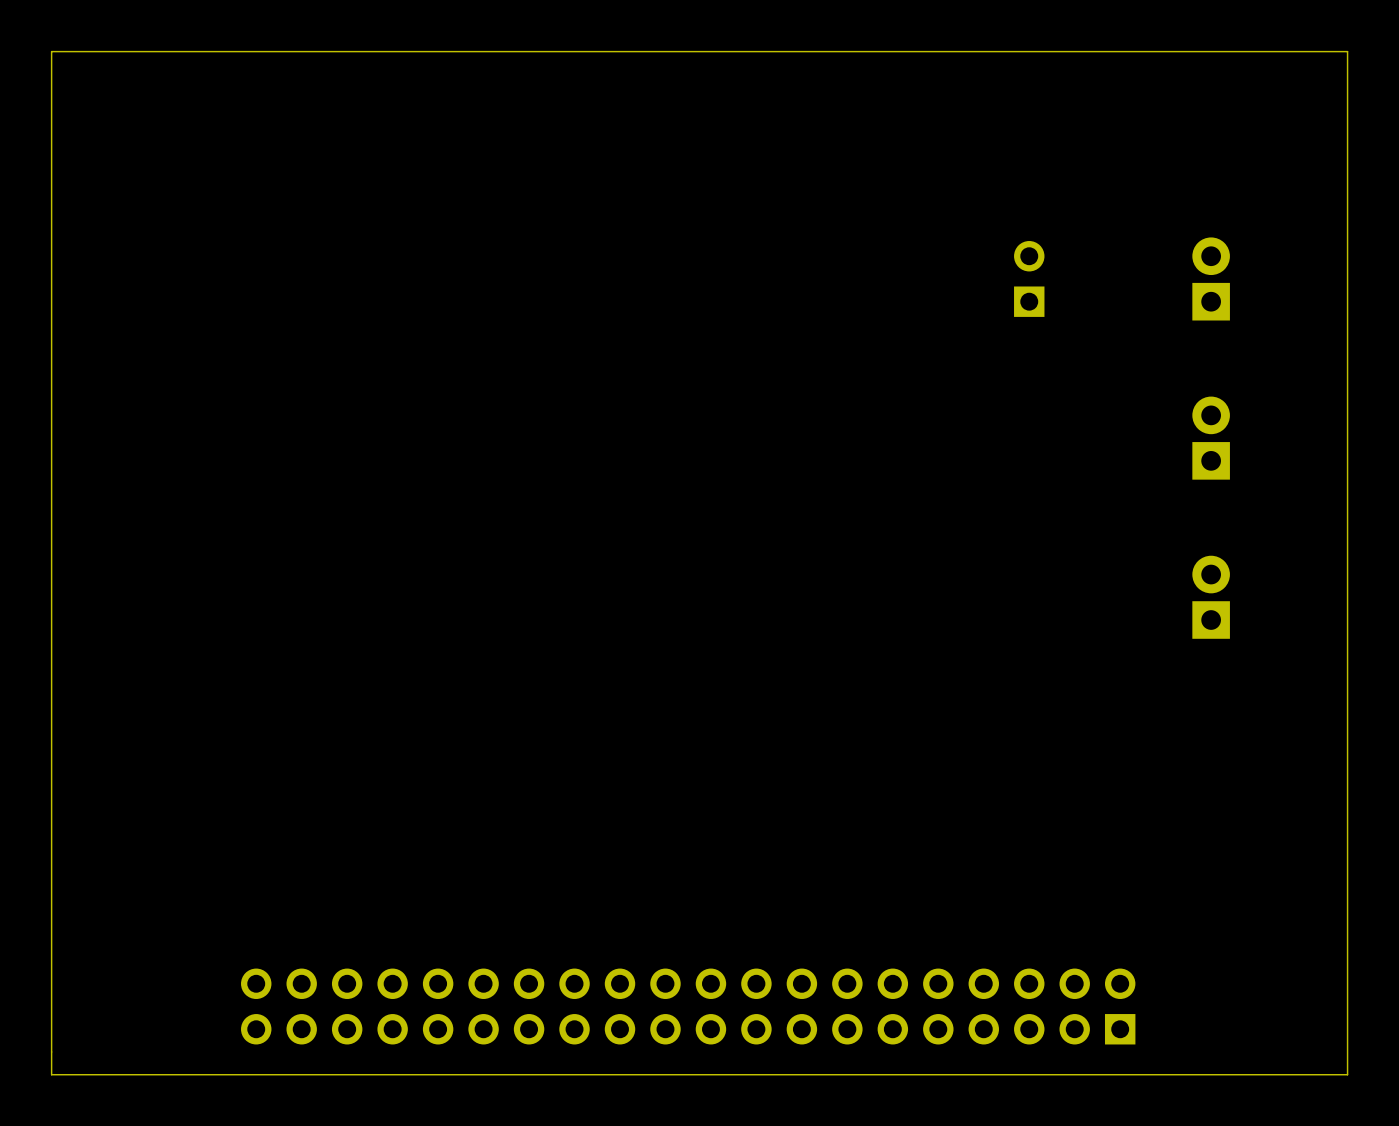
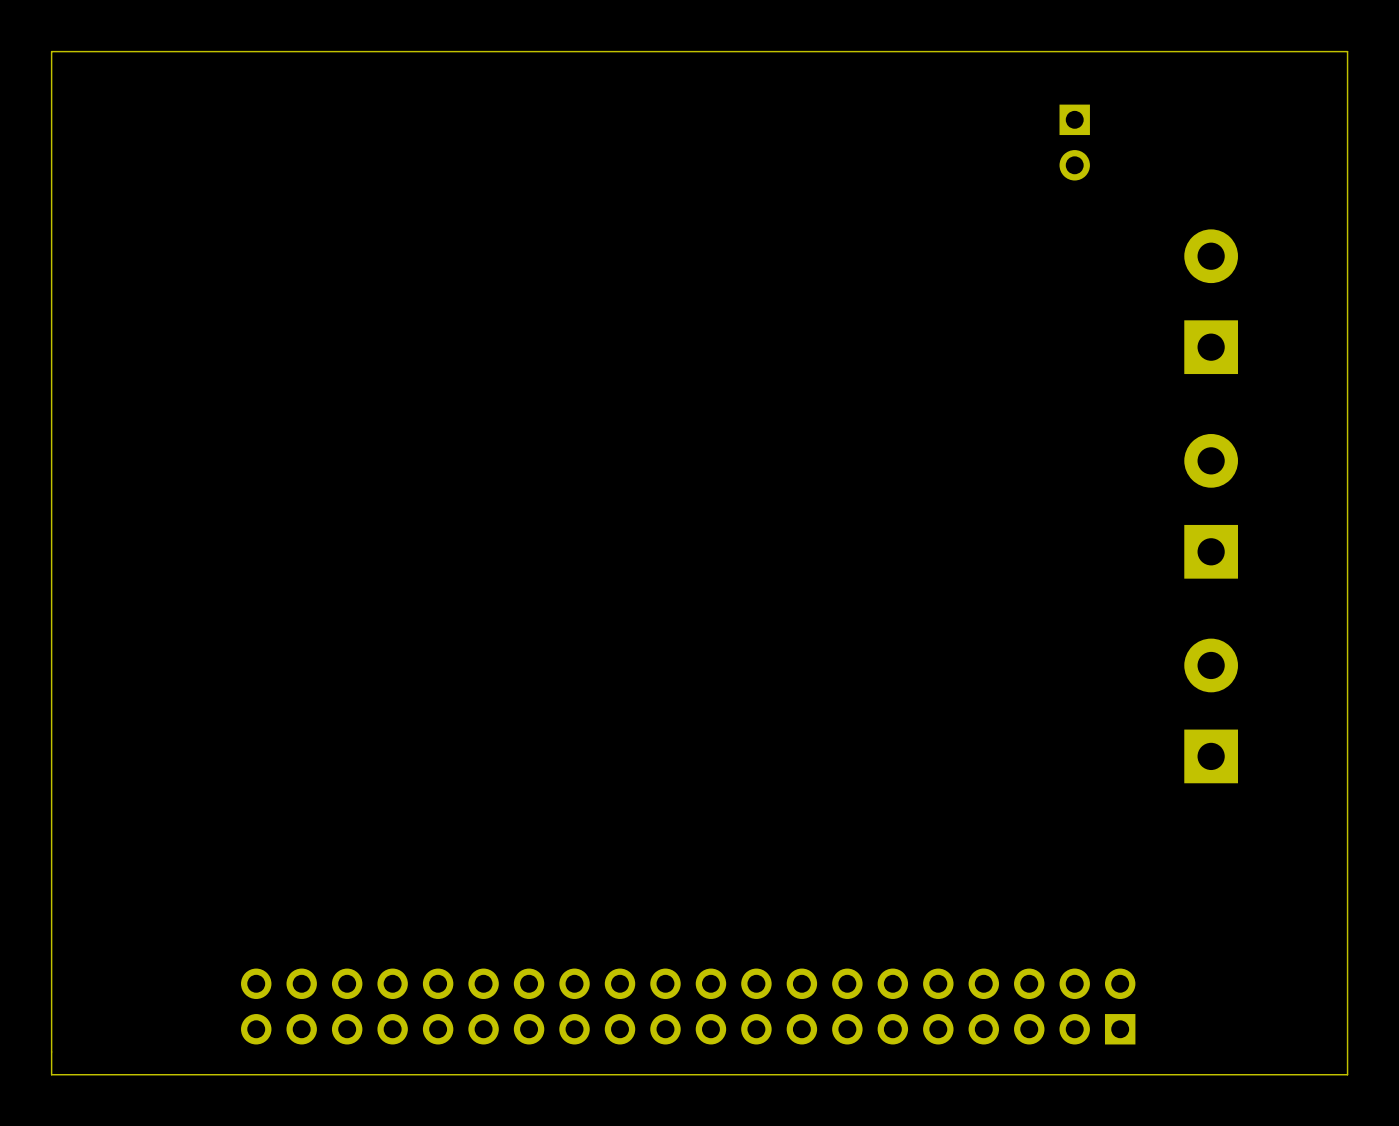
part rotation: 0° (1029, 278) -> 180° (1074, 142)
part position: (1029, 278) -> (1074, 142)
part: (1211, 278) -> none
part: none -> (1211, 301)
part: (1211, 438) -> none
part: none -> (1211, 506)
part: (1211, 597) -> none
part: none -> (1211, 710)

